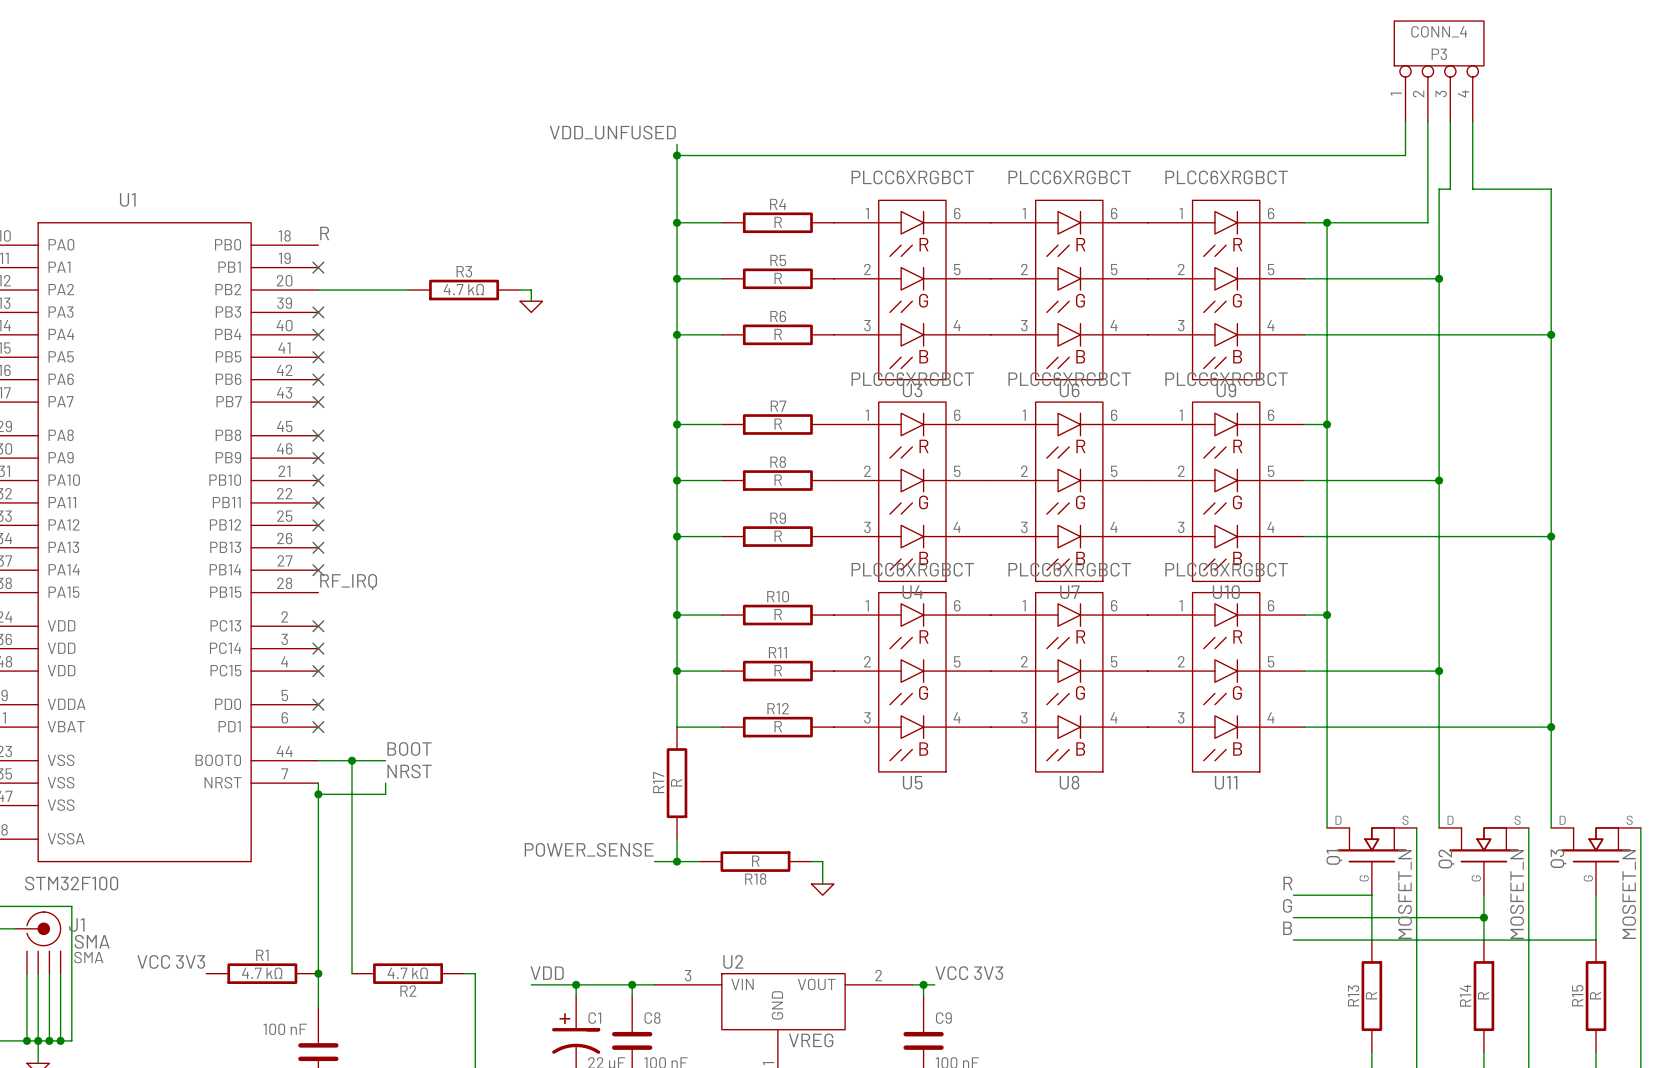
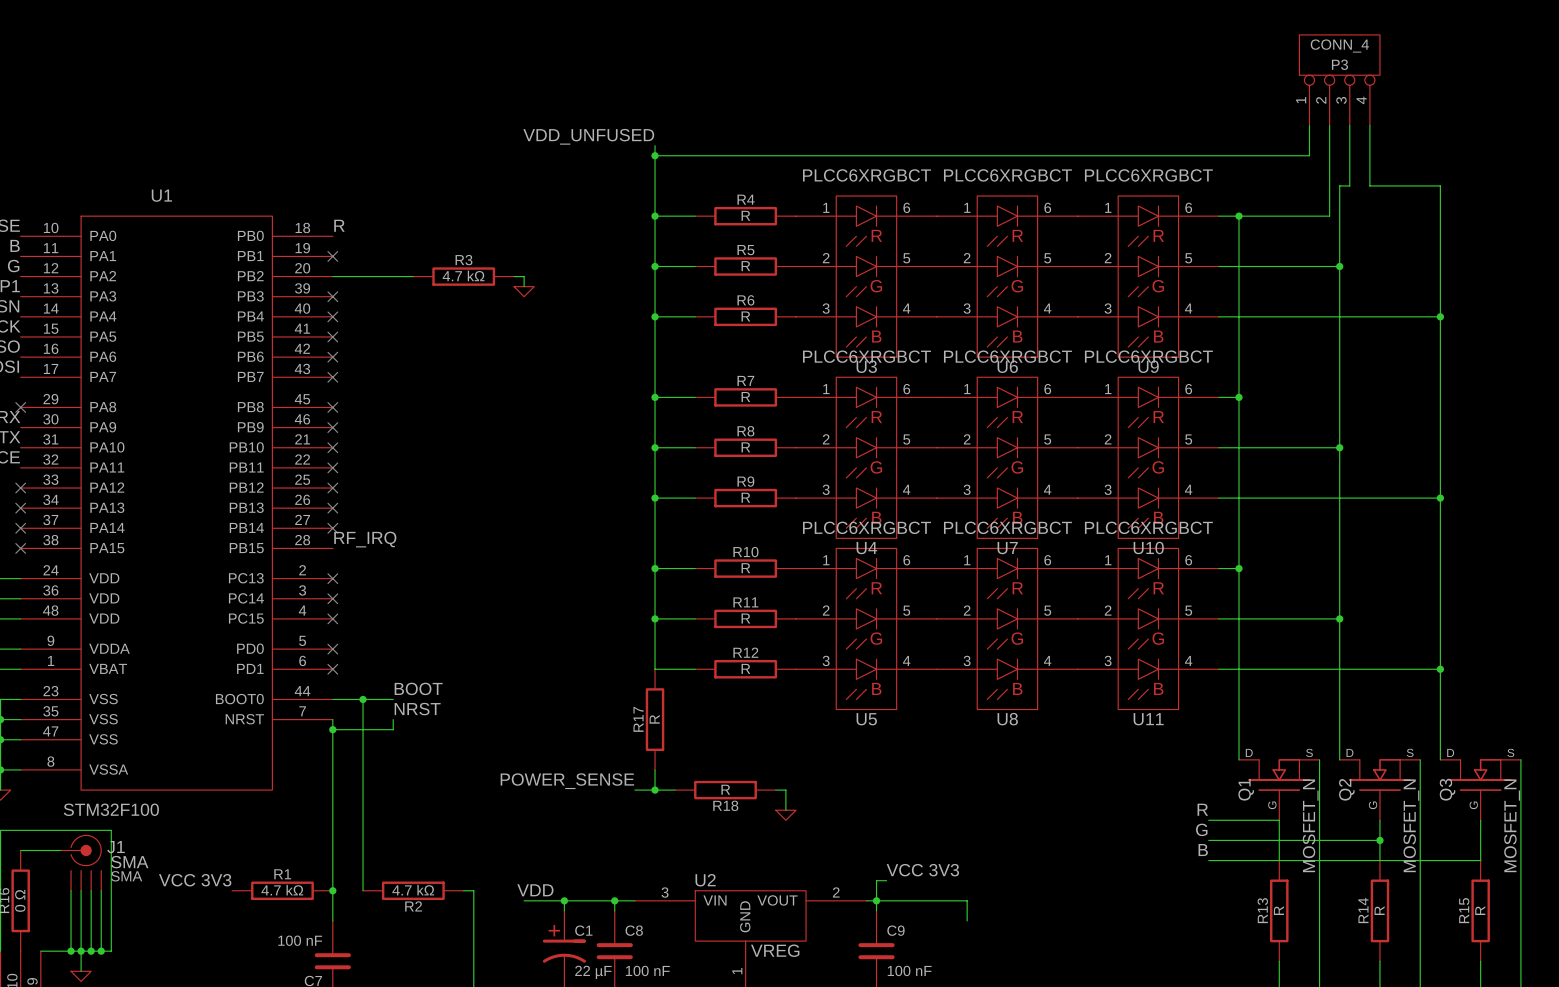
wire: none -> (886, 880) (876, 880) (876, 900)
label position: VCC 3V3 (969, 973) -> VCC 3V3 (922, 870)
wire: none -> (886, 900) (967, 900) (967, 920)

